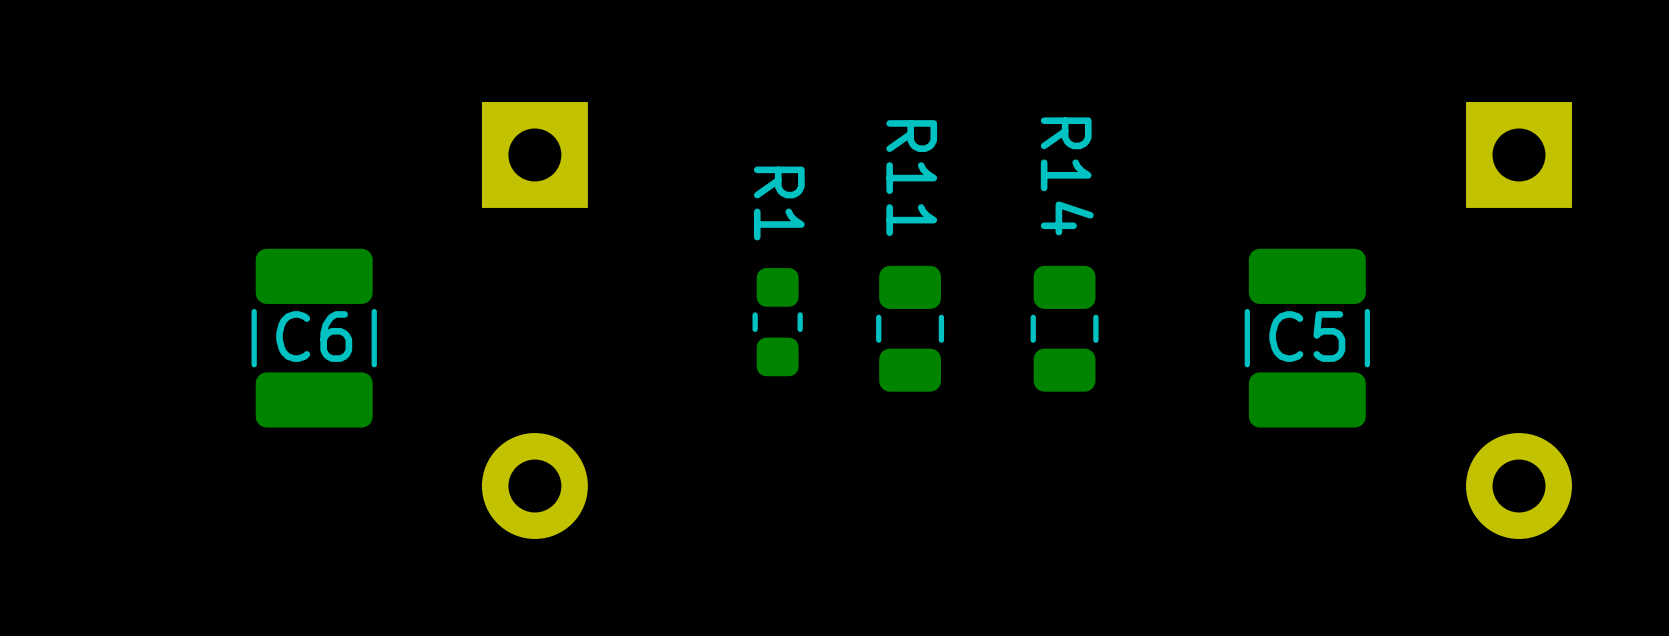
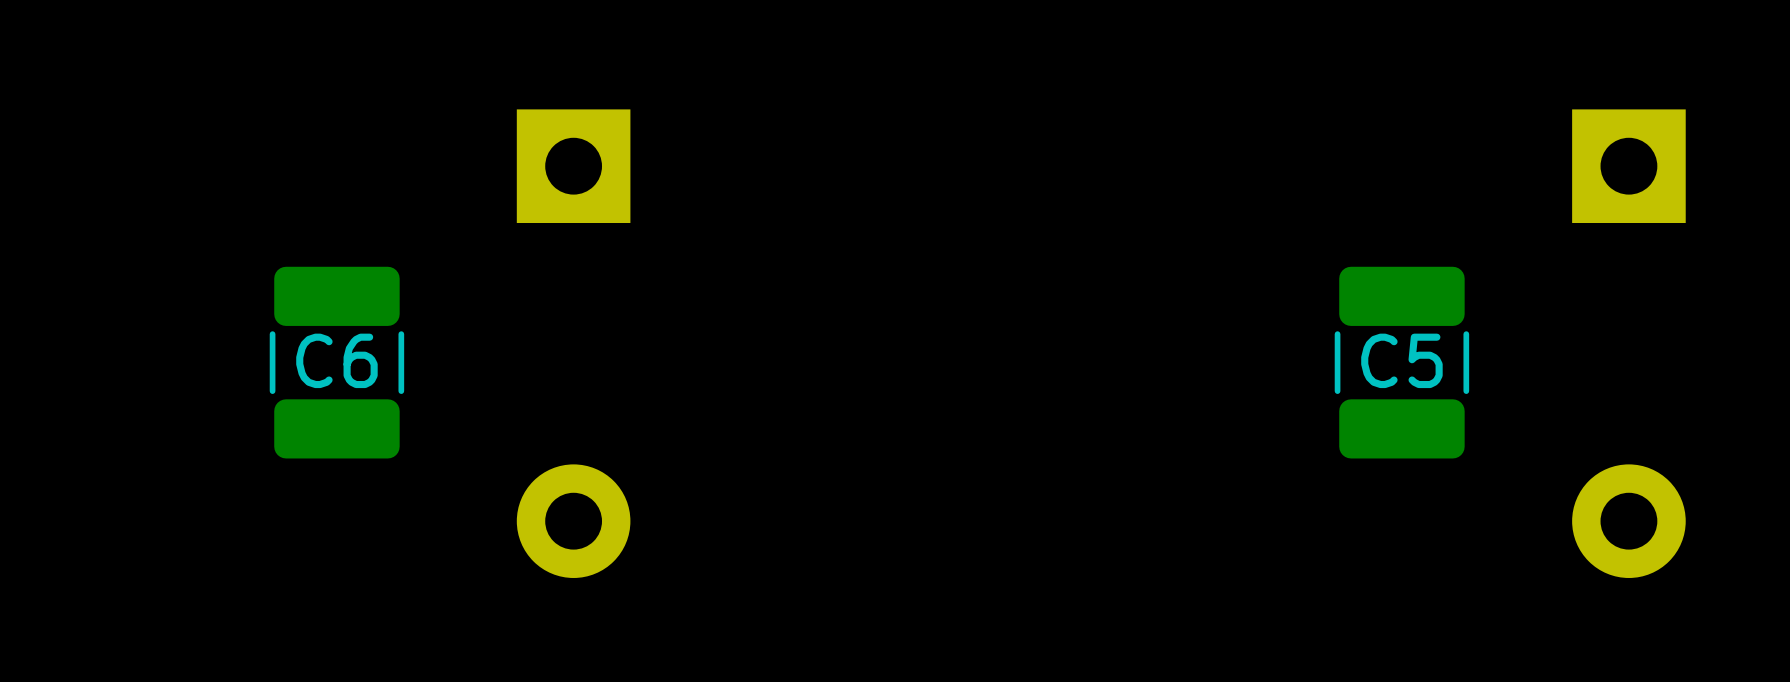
R1: (777, 322) -> none
R11: (910, 328) -> none
R14: (1064, 328) -> none

